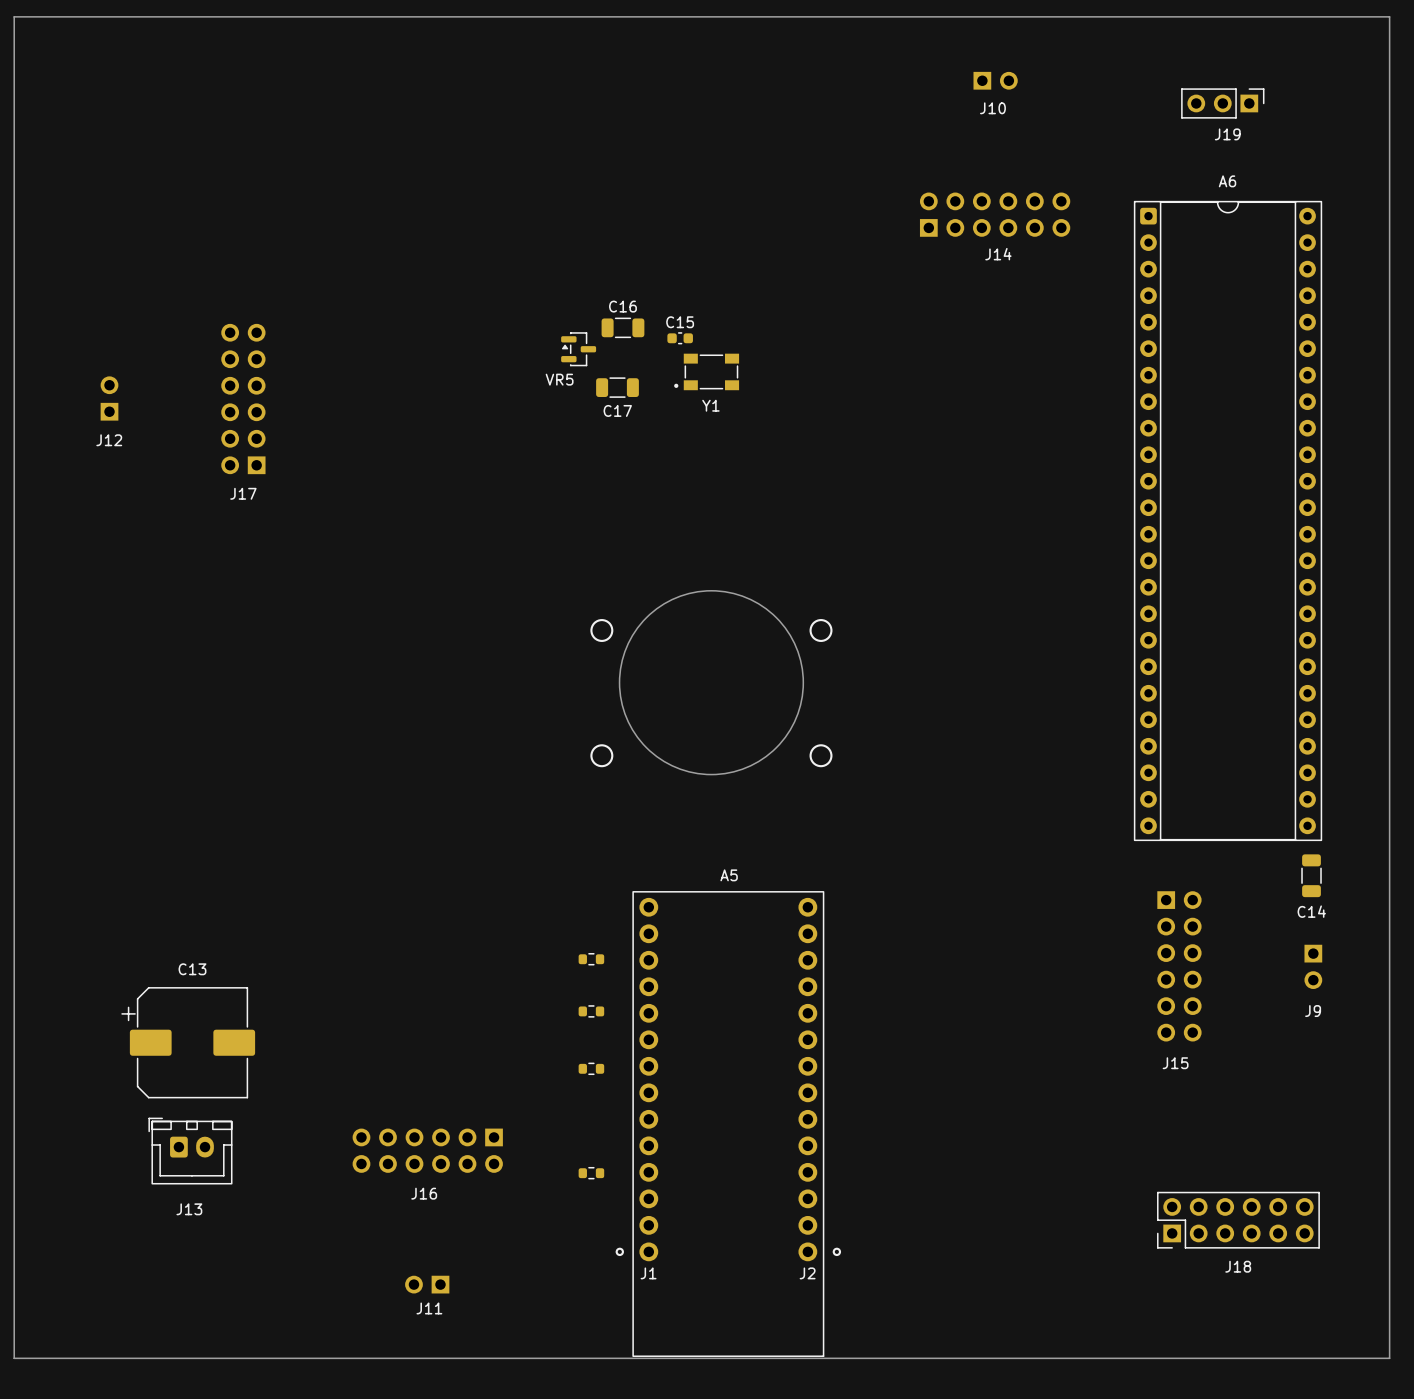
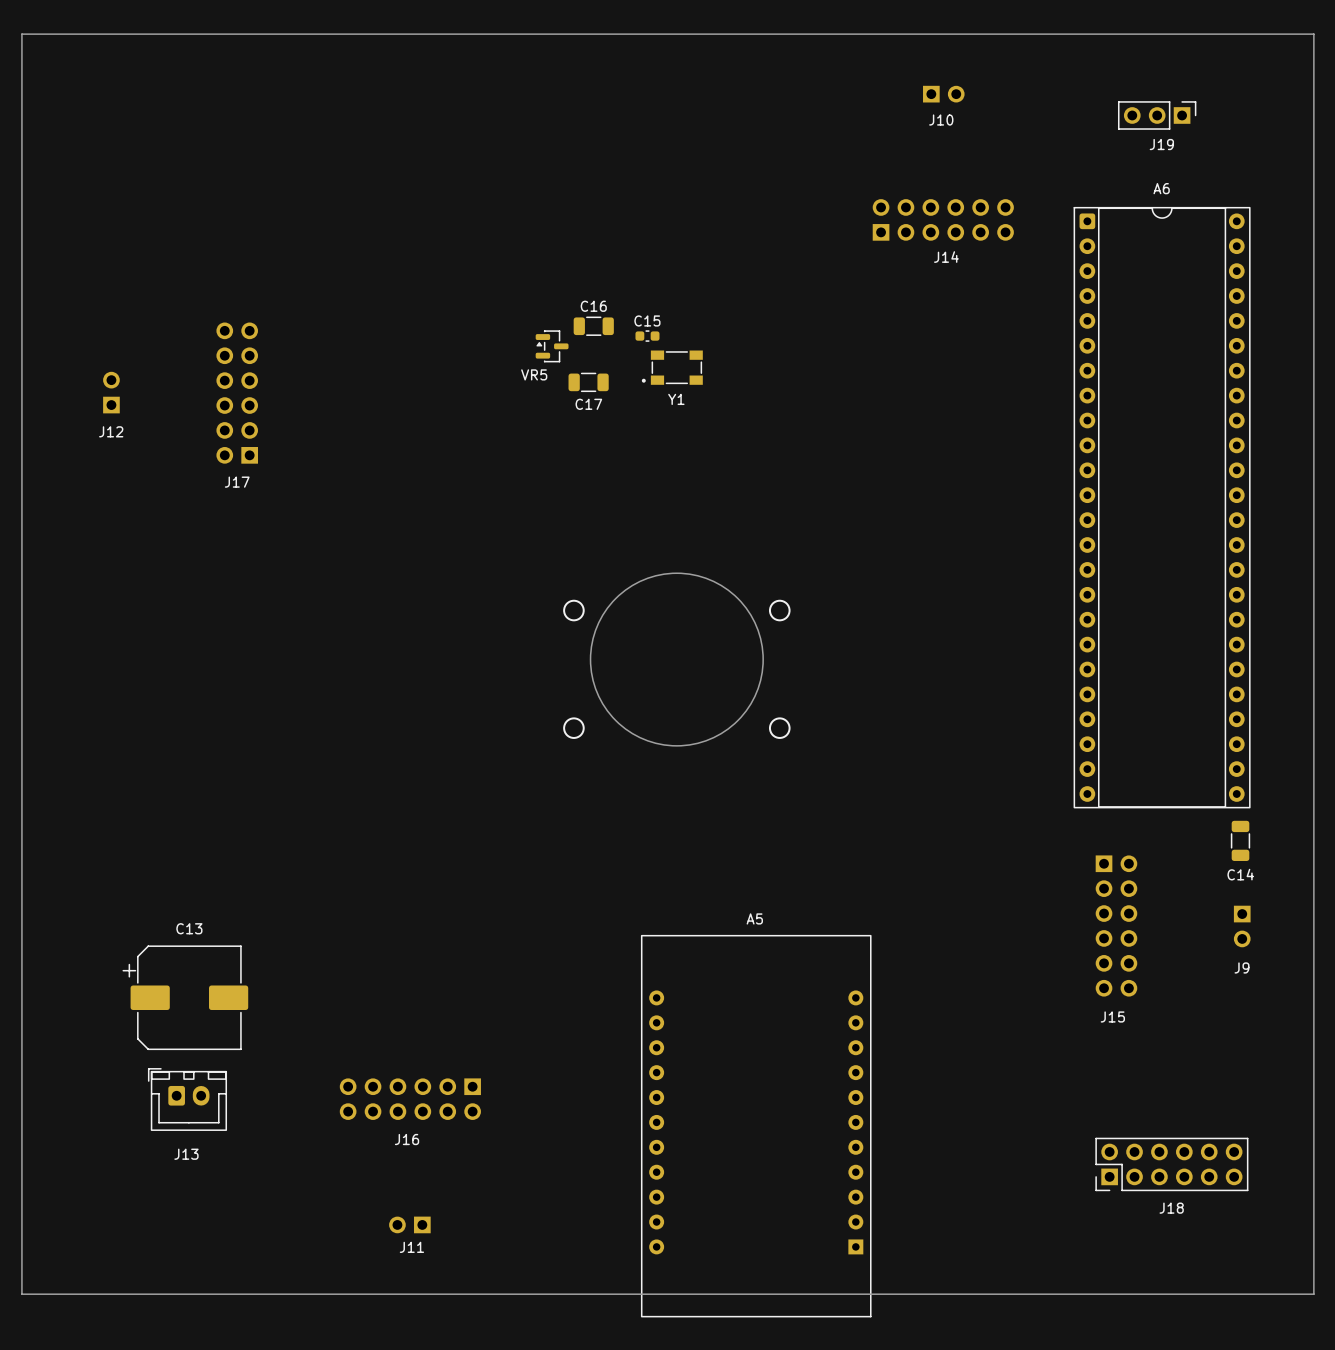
A5 name position: A5 (729, 875) -> A5 (754, 918)
A5 footprint: [615, 891, 842, 1357] -> [640, 934, 872, 1318]
part: (591, 959) -> none
part: (591, 1011) -> none
part: (591, 1068) -> none
part: (591, 1173) -> none

